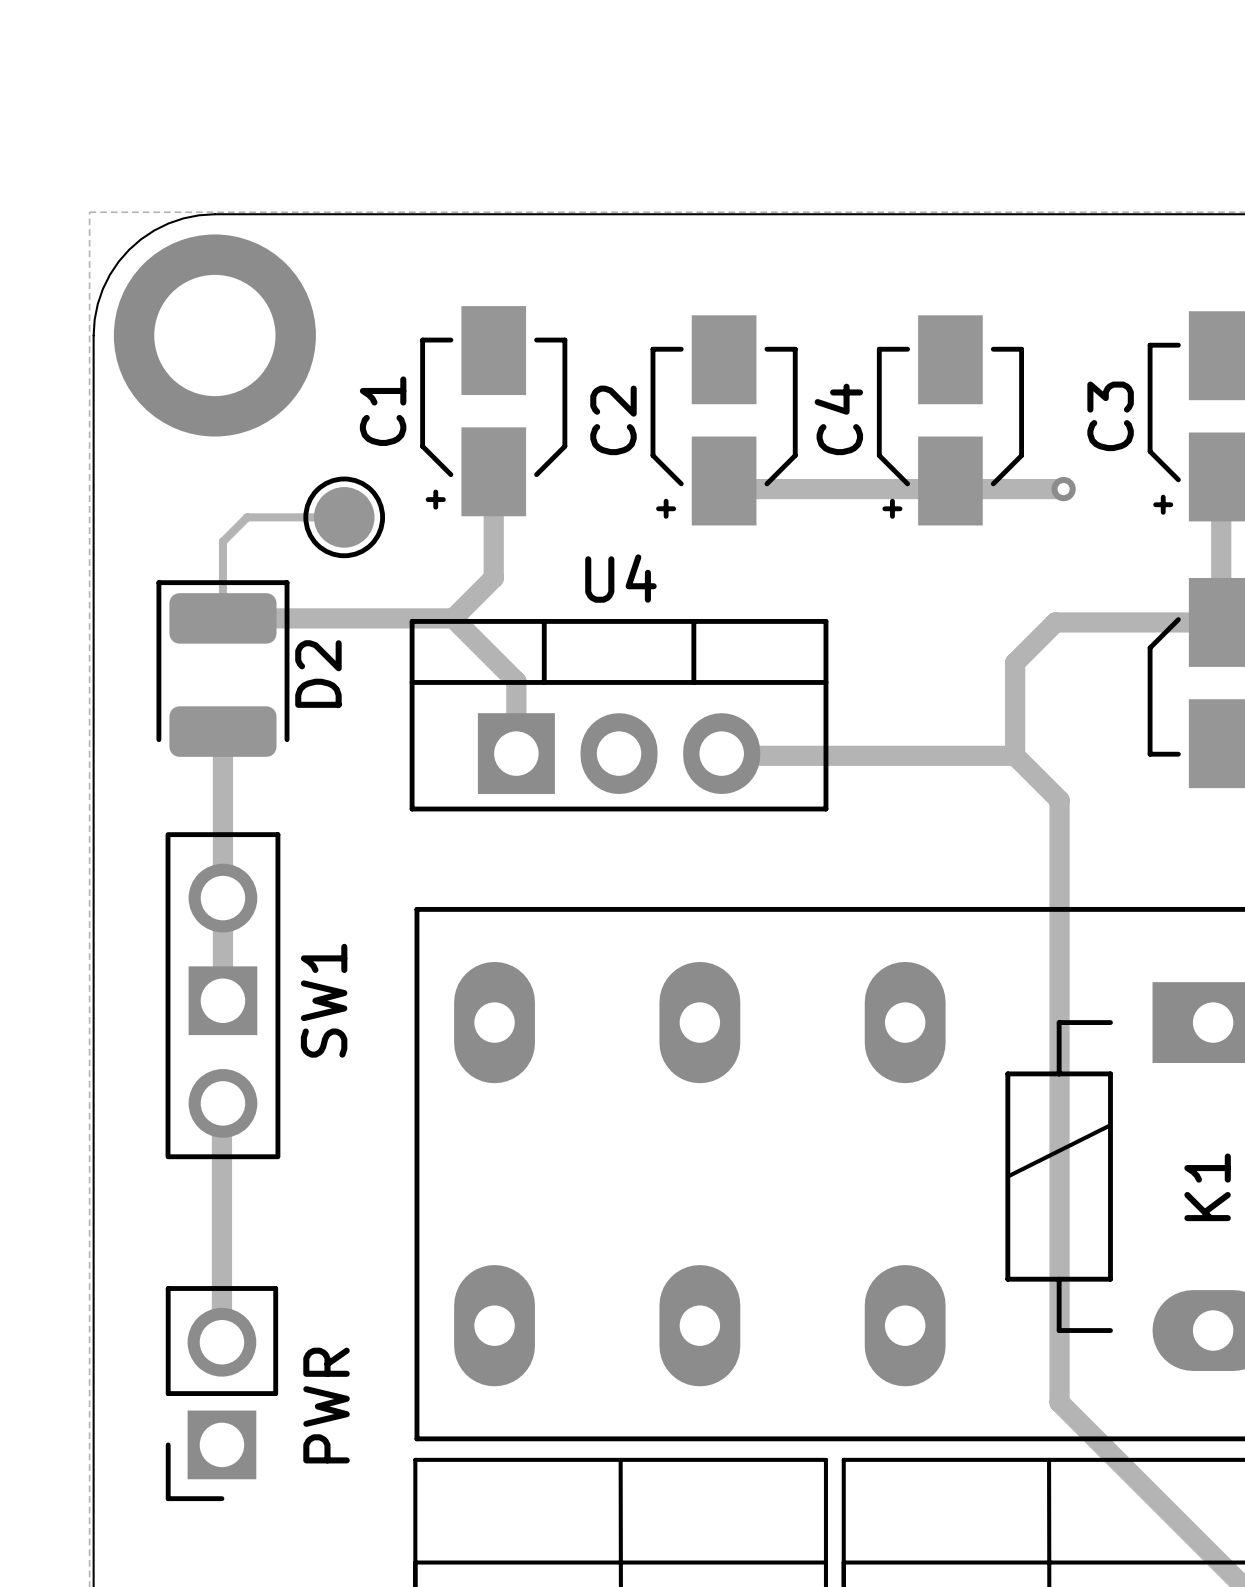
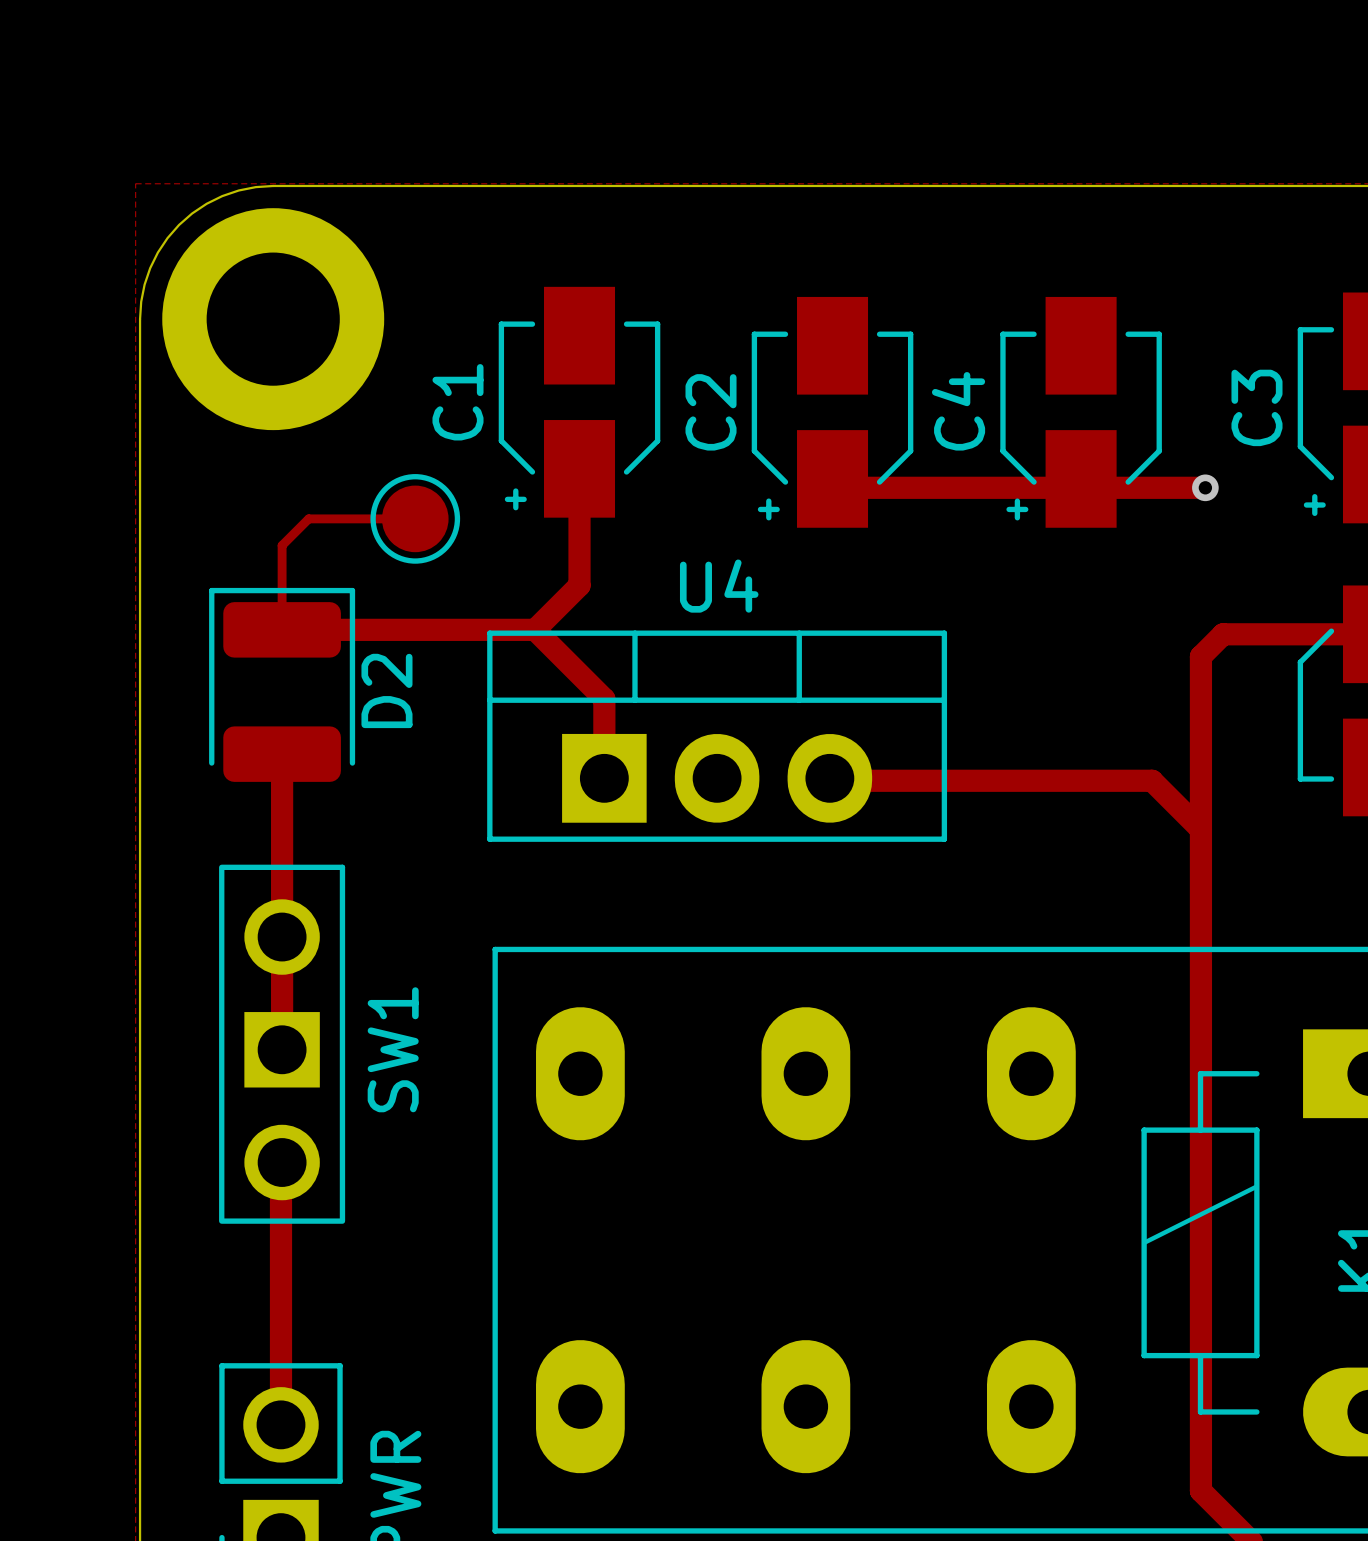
track: (1079, 622) (1055, 622) (1015, 662) (1015, 755) -> (1223, 634) (1200, 656) (1200, 829)

